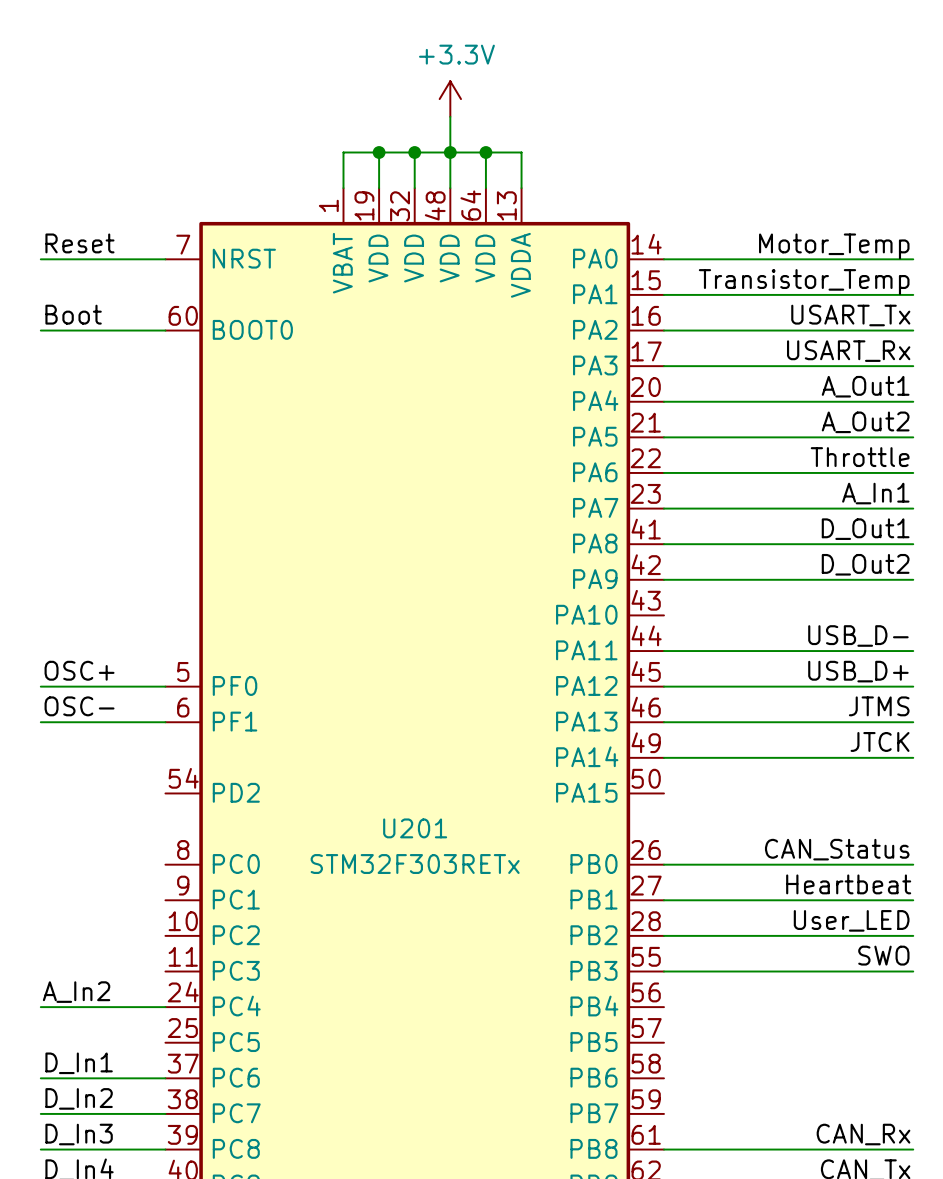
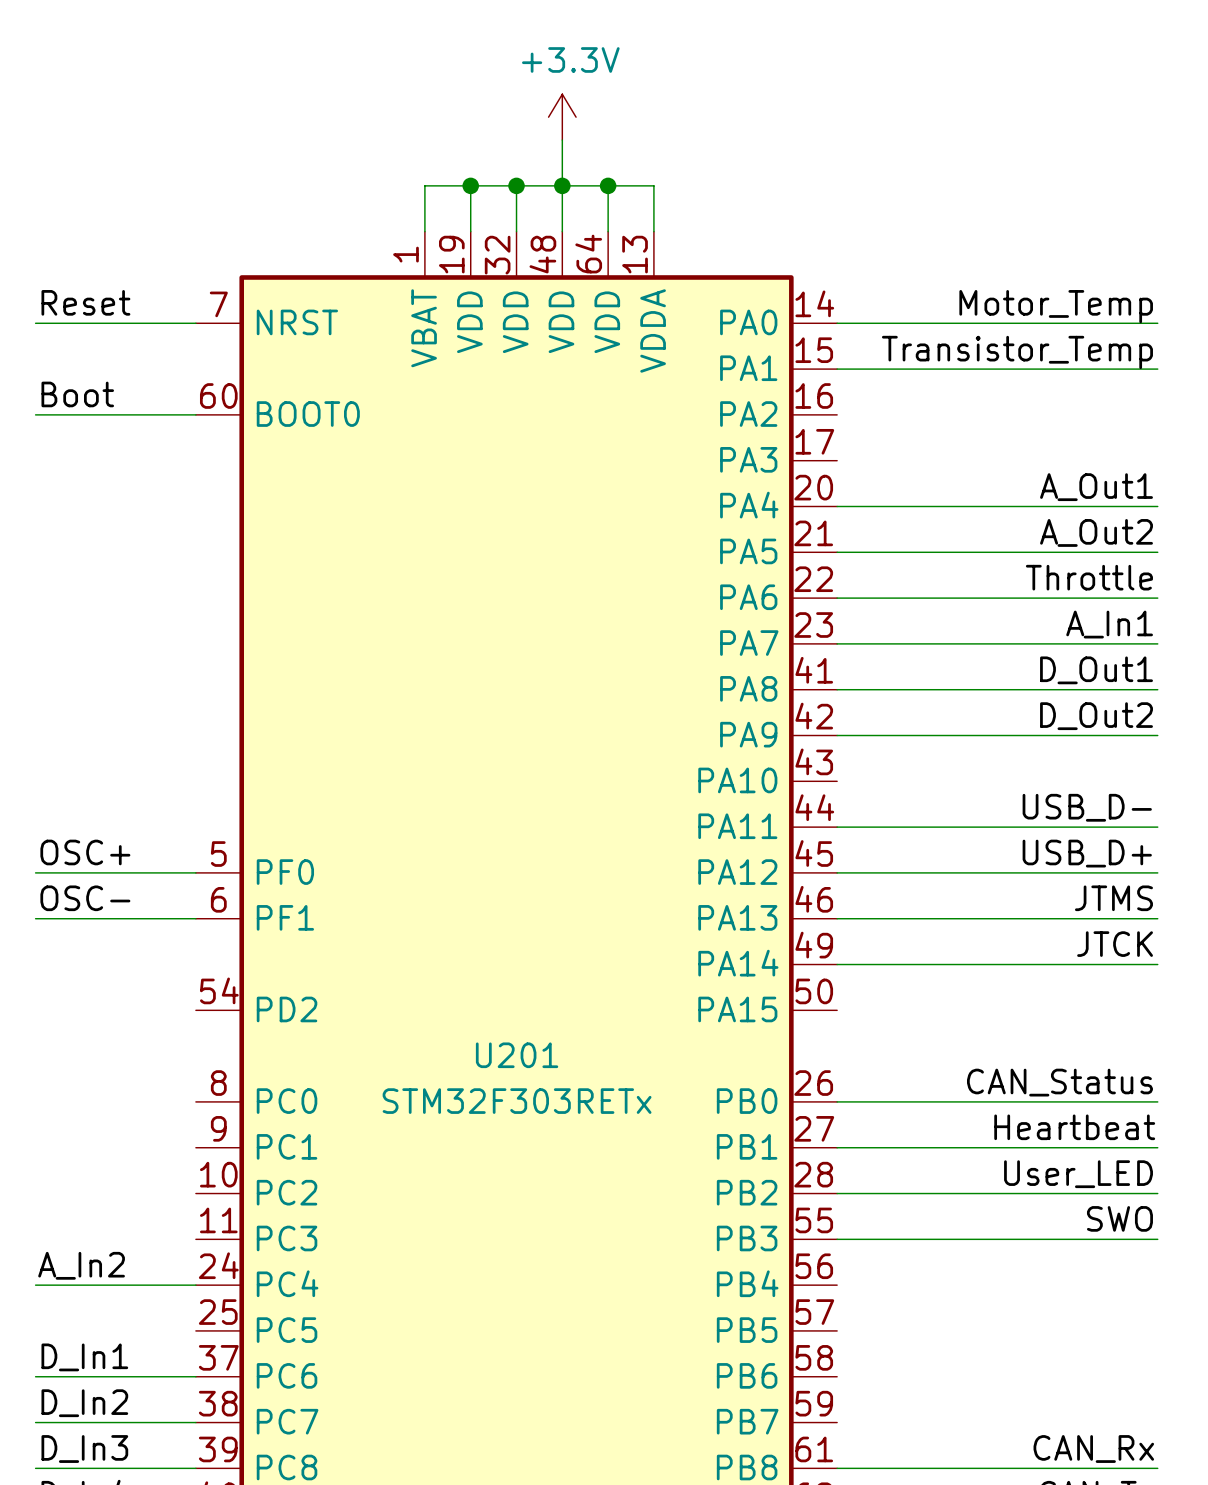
label: USART_Tx (850, 315) -> none
wire: (663, 330) (913, 330) -> none
label: USART_Rx (848, 351) -> none
wire: (663, 366) (913, 366) -> none

